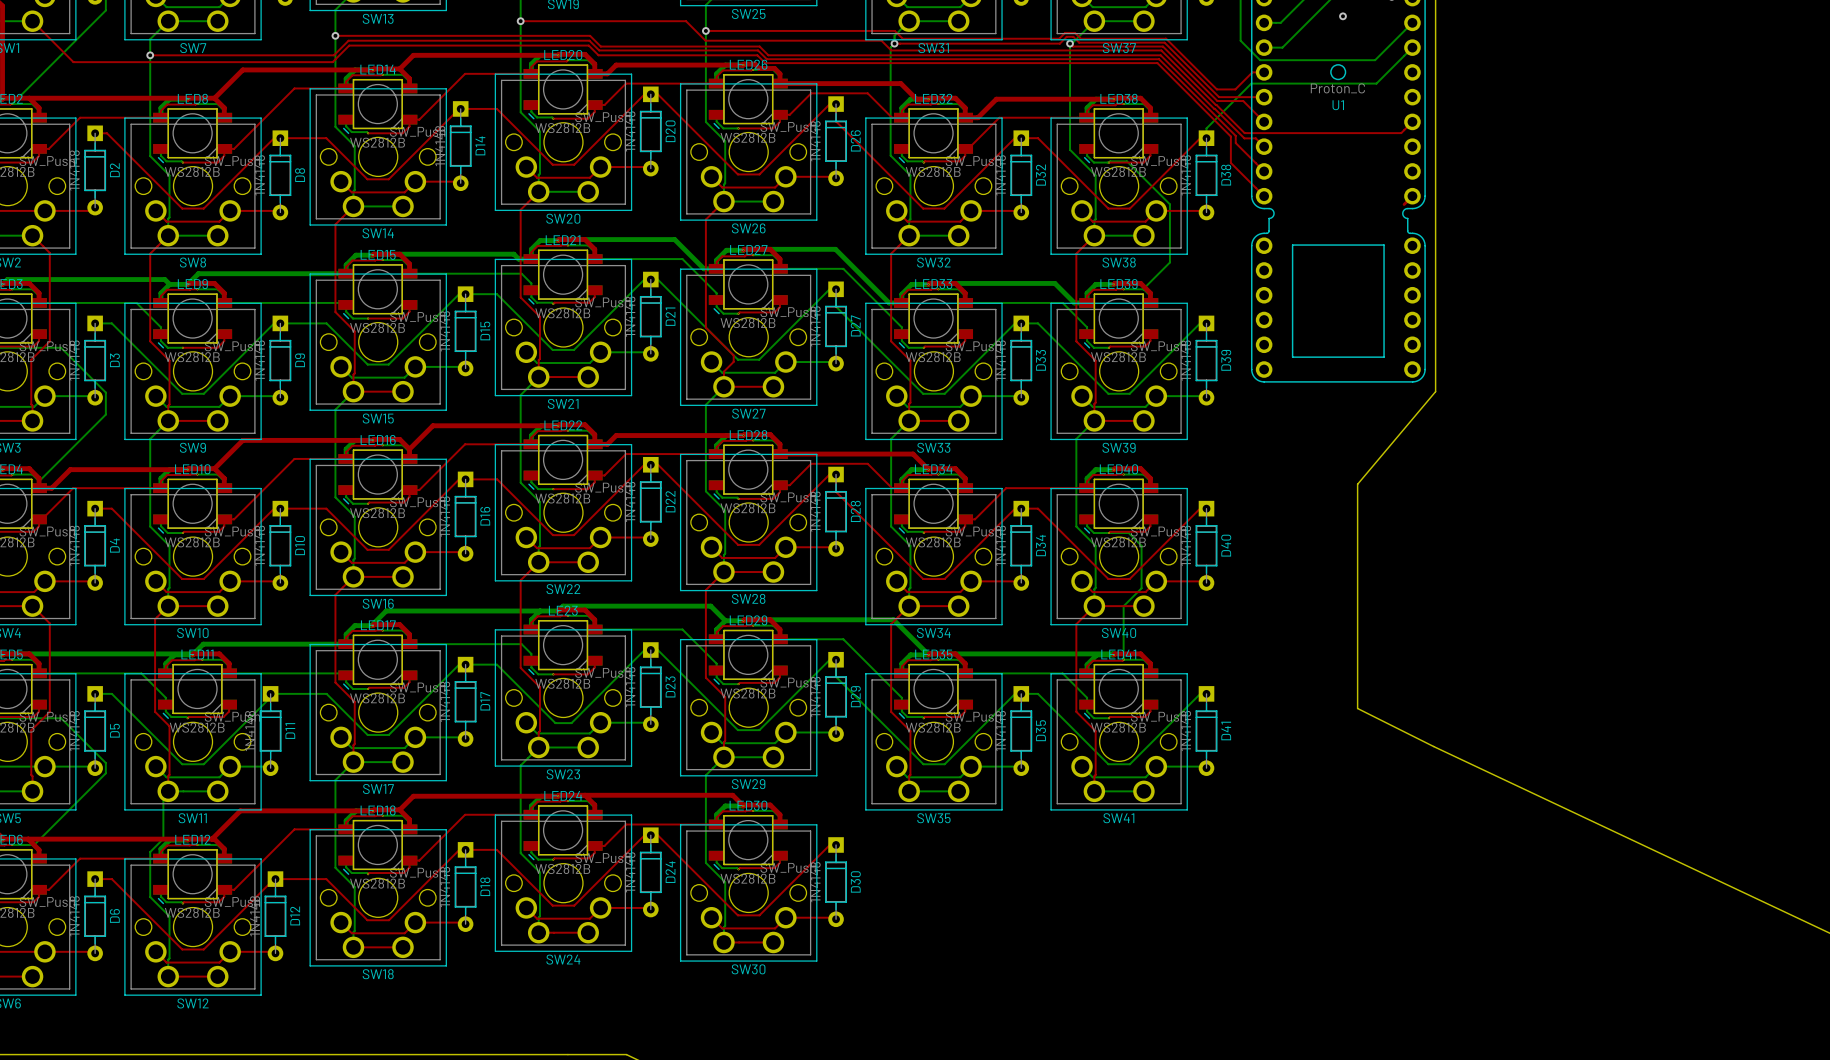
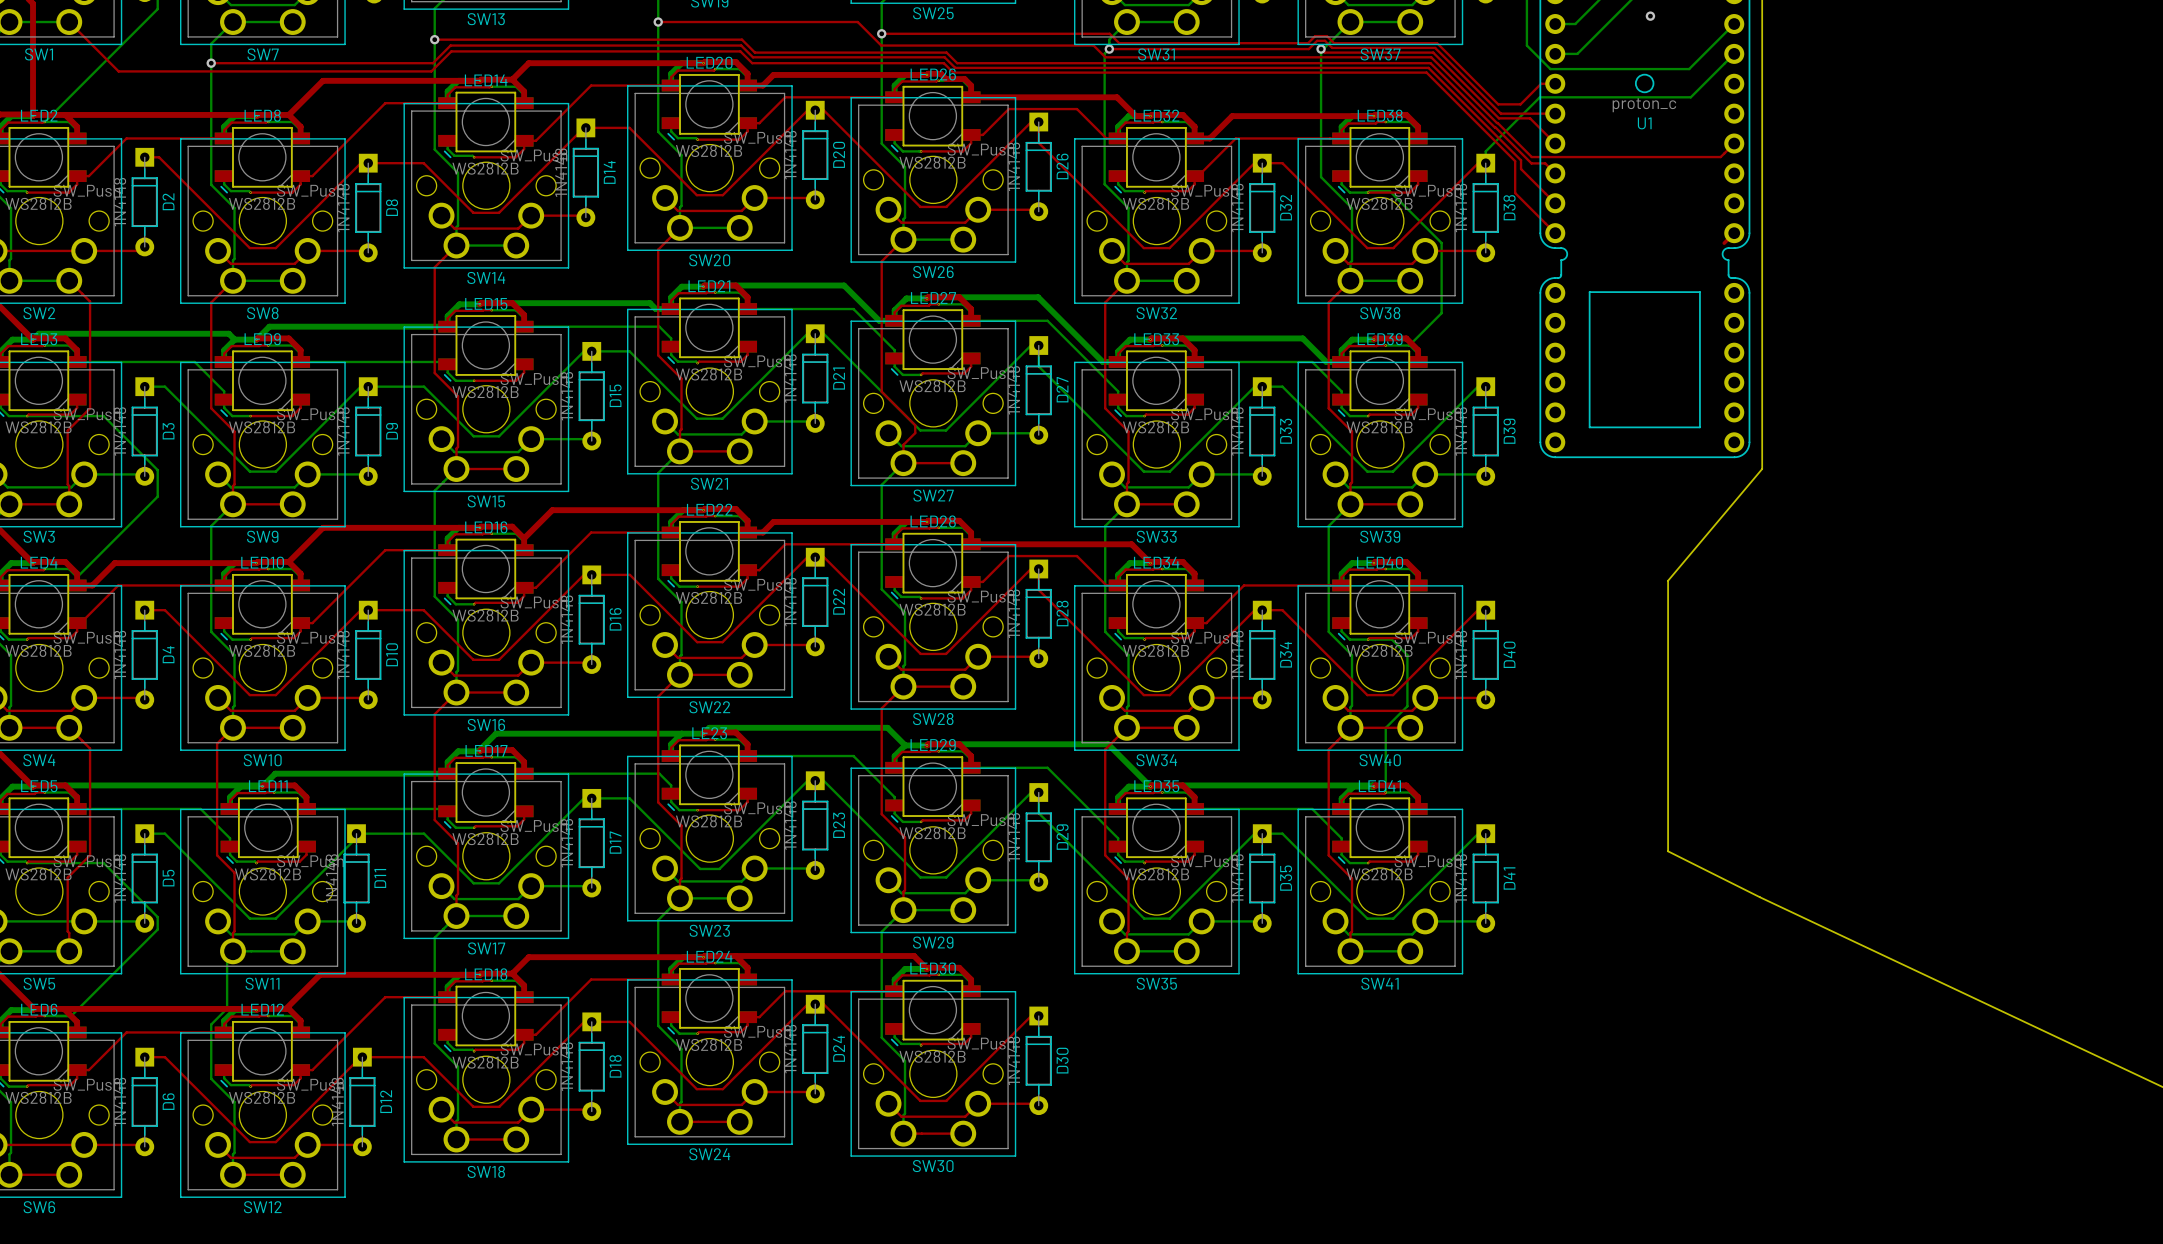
U1 value: Proton_C (1337, 88) -> proton_c (1644, 105)

